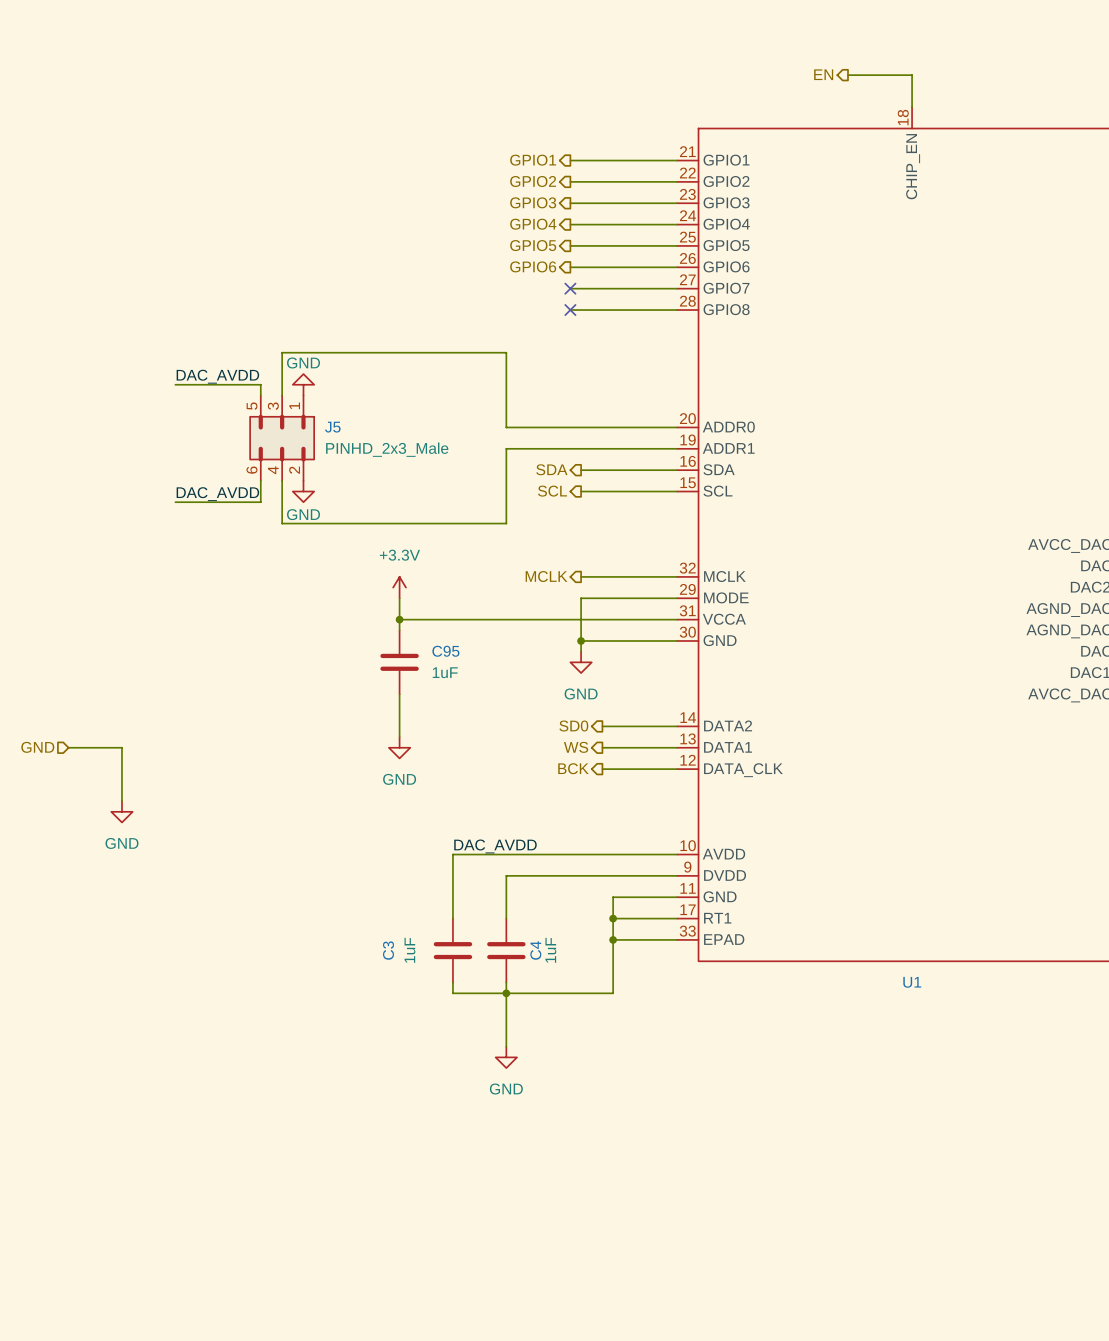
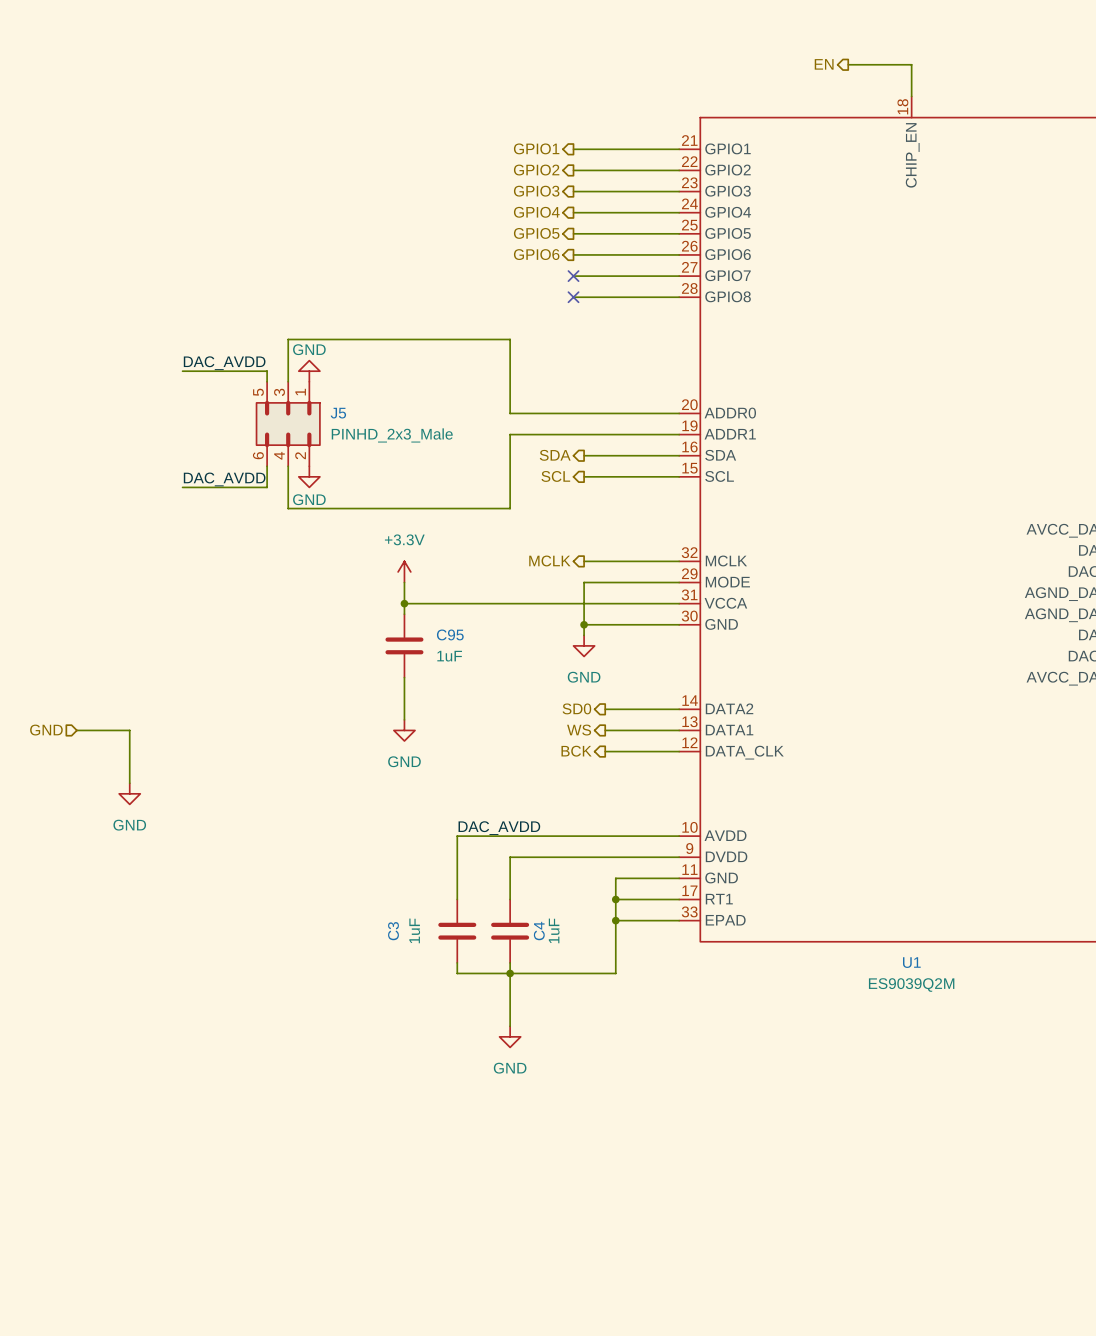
U1 value: none -> ES9039Q2M (911, 985)

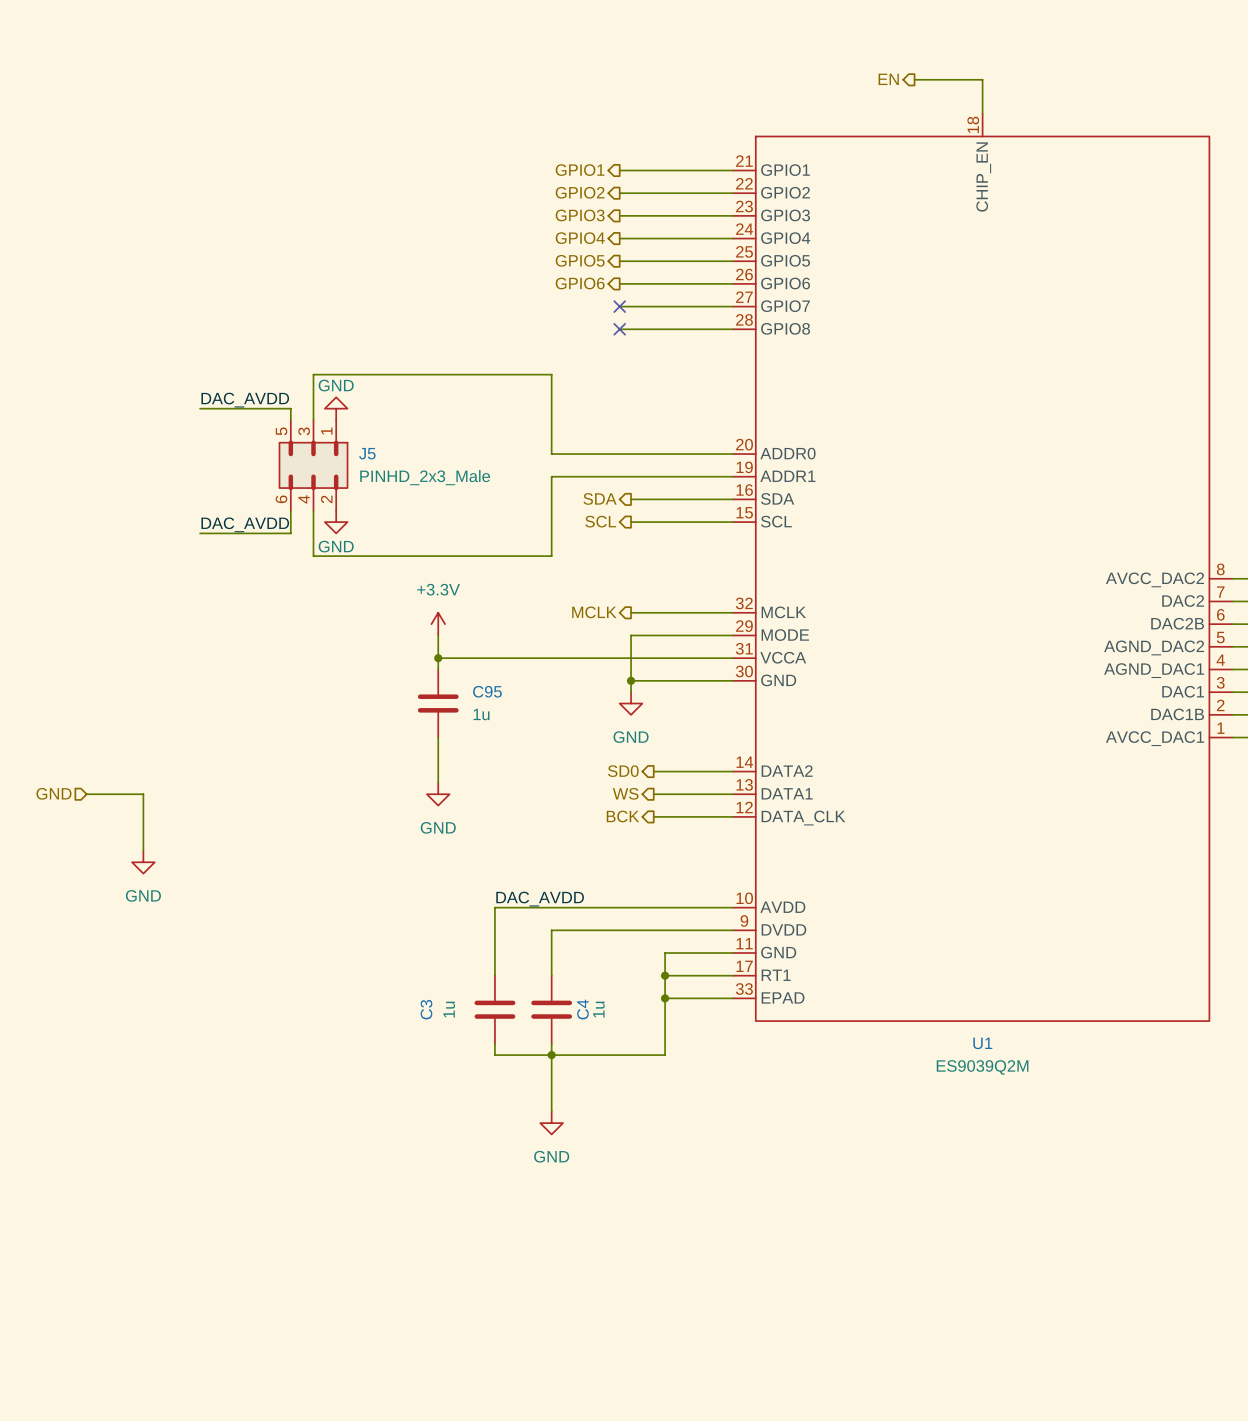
C95 value: 1uF (449, 656) -> 1u (481, 714)
C3 value: 1uF (414, 930) -> 1u (449, 1009)
C4 value: 1uF (554, 930) -> 1u (598, 1009)

